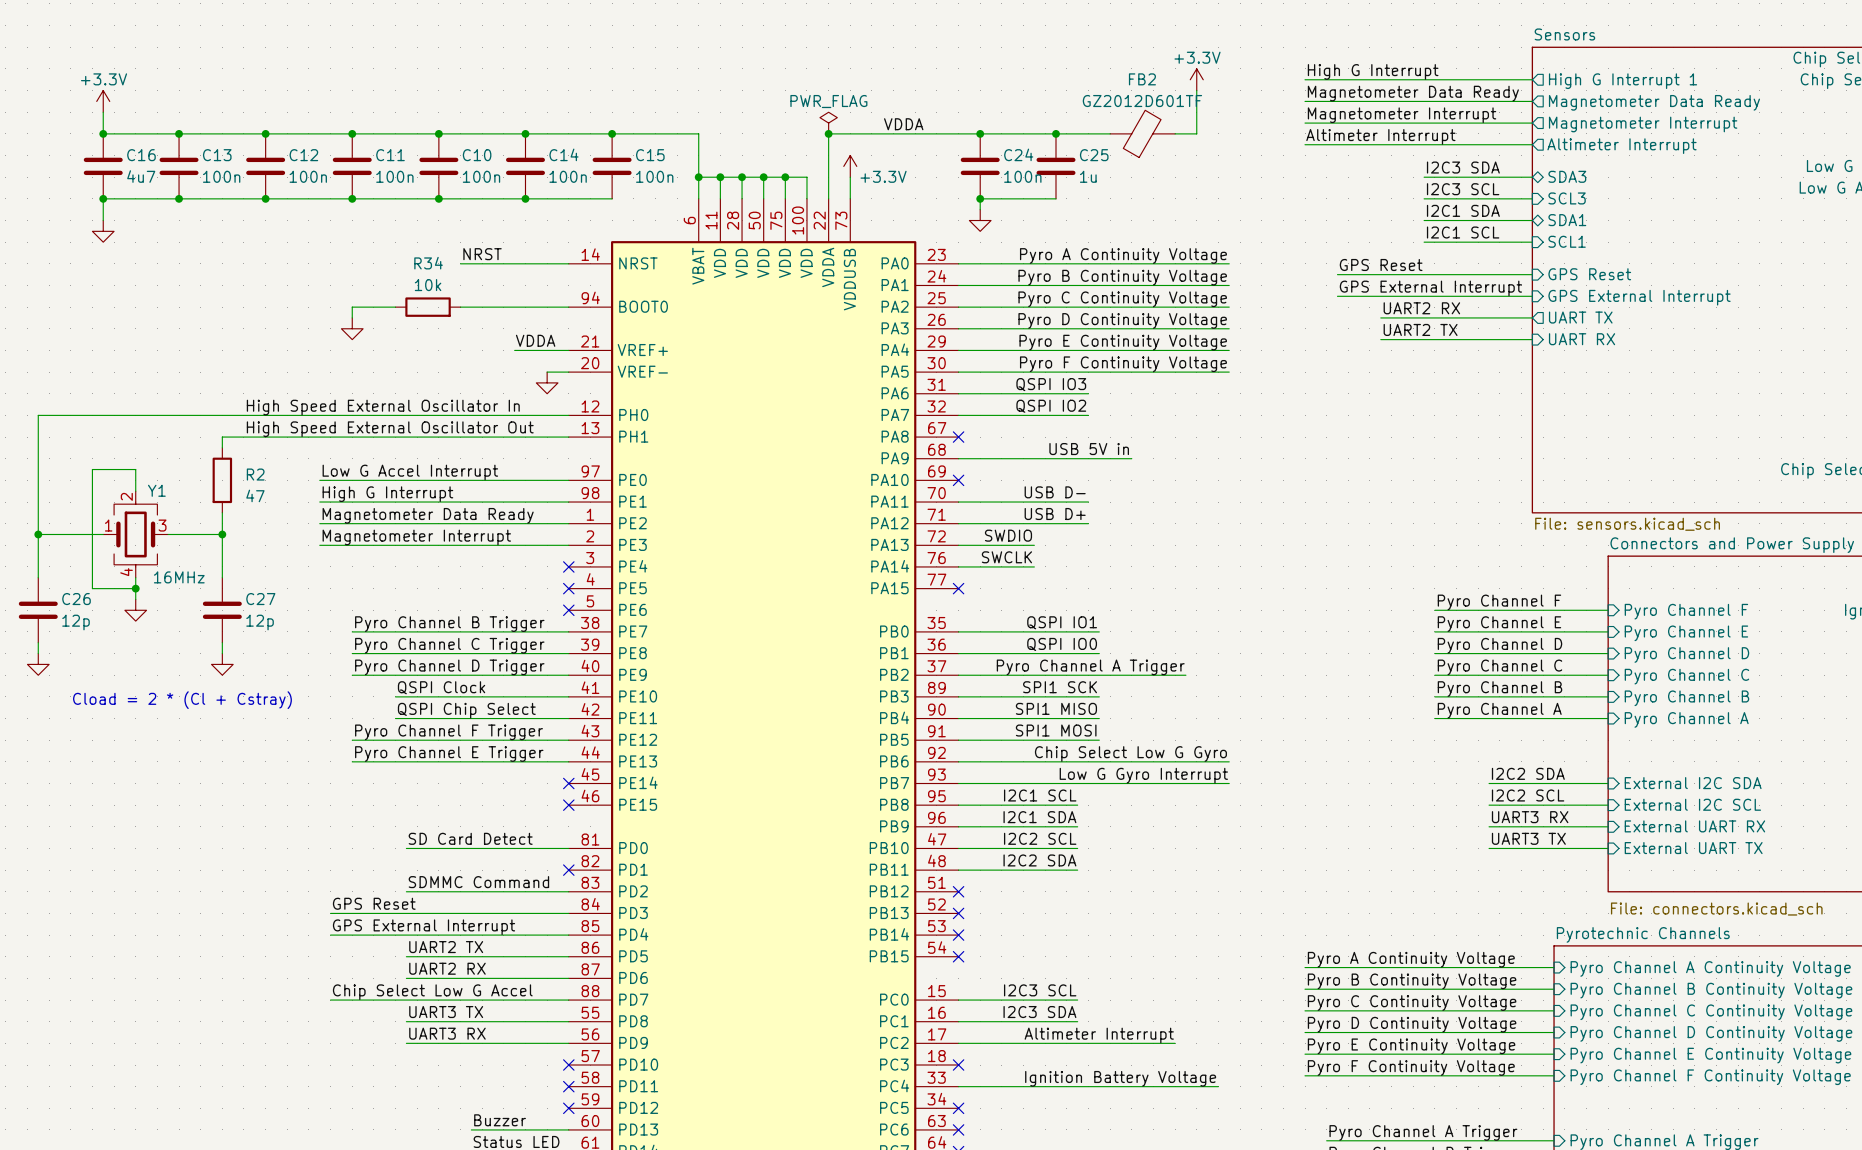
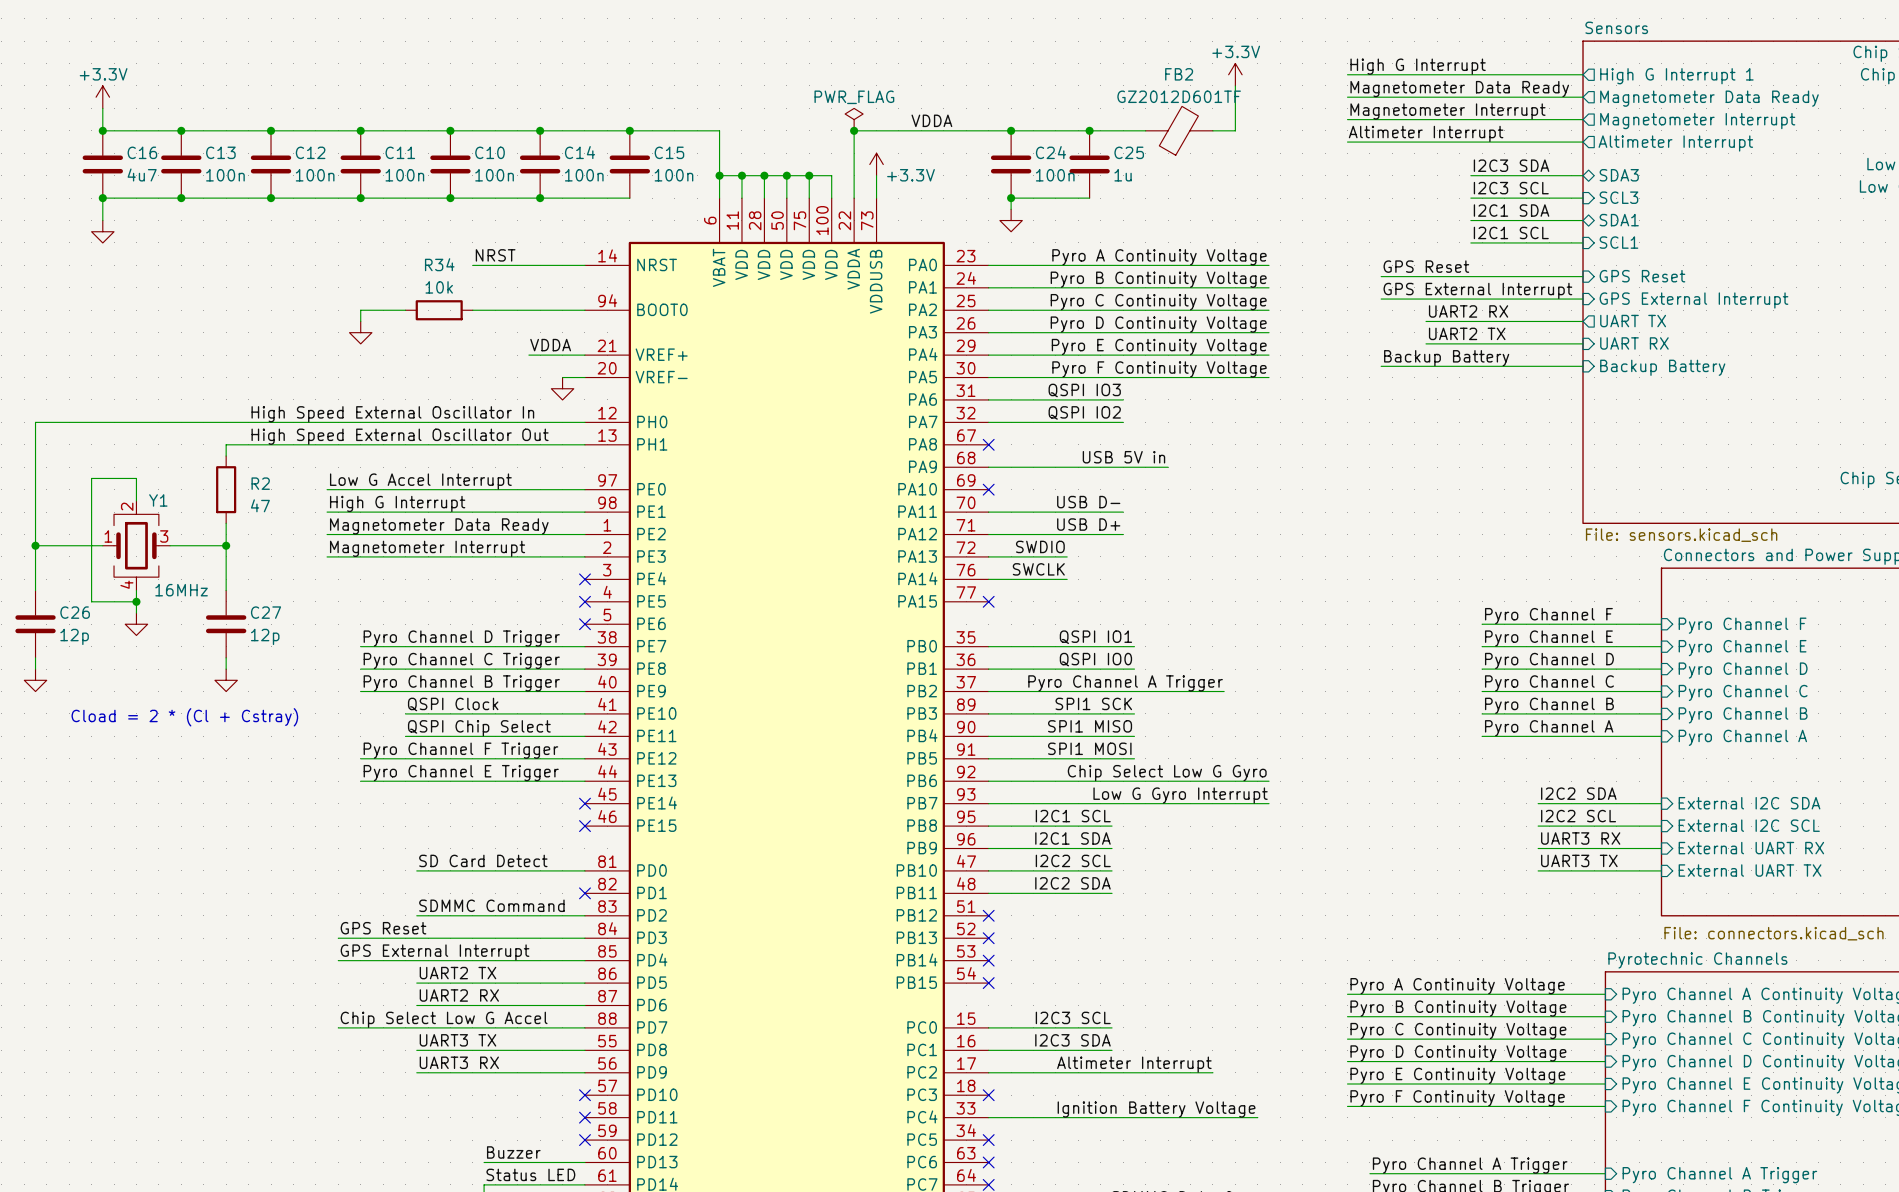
label: none -> Backup Battery (1446, 358)
wire: none -> (1381, 366) (1583, 366)
sheet pin: none -> Backup Battery (1662, 367)
label: Pyro Channel B Trigger (449, 624) -> Pyro Channel D Trigger (461, 638)
label: Pyro Channel D Trigger (449, 667) -> Pyro Channel B Trigger (461, 683)

